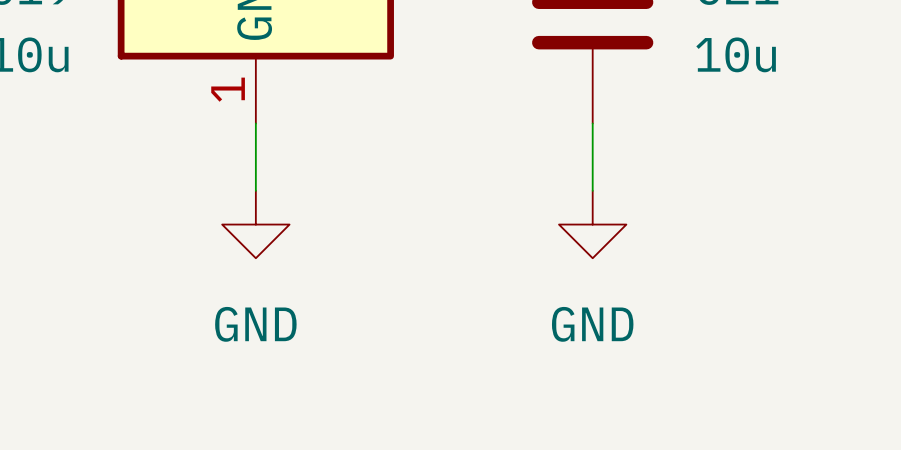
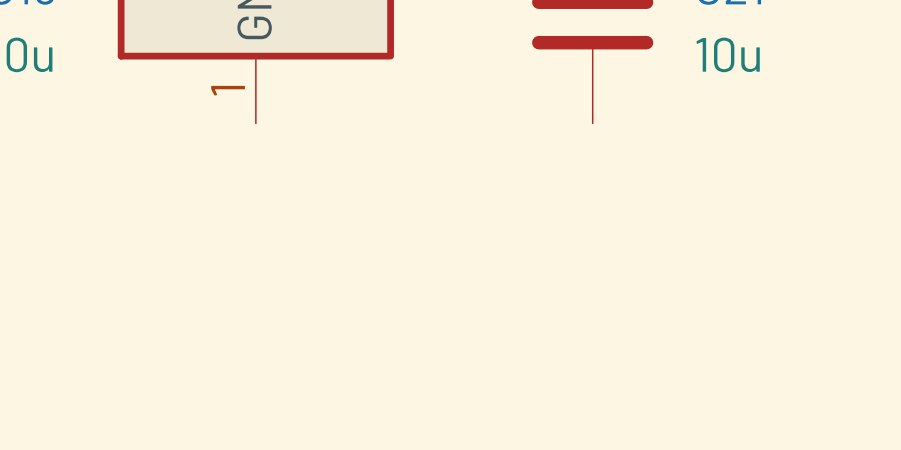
wire: (255, 123) (255, 190) -> none
wire: (592, 123) (592, 190) -> none
power symbol: GND (255, 224) -> none
power symbol: GND (592, 224) -> none

